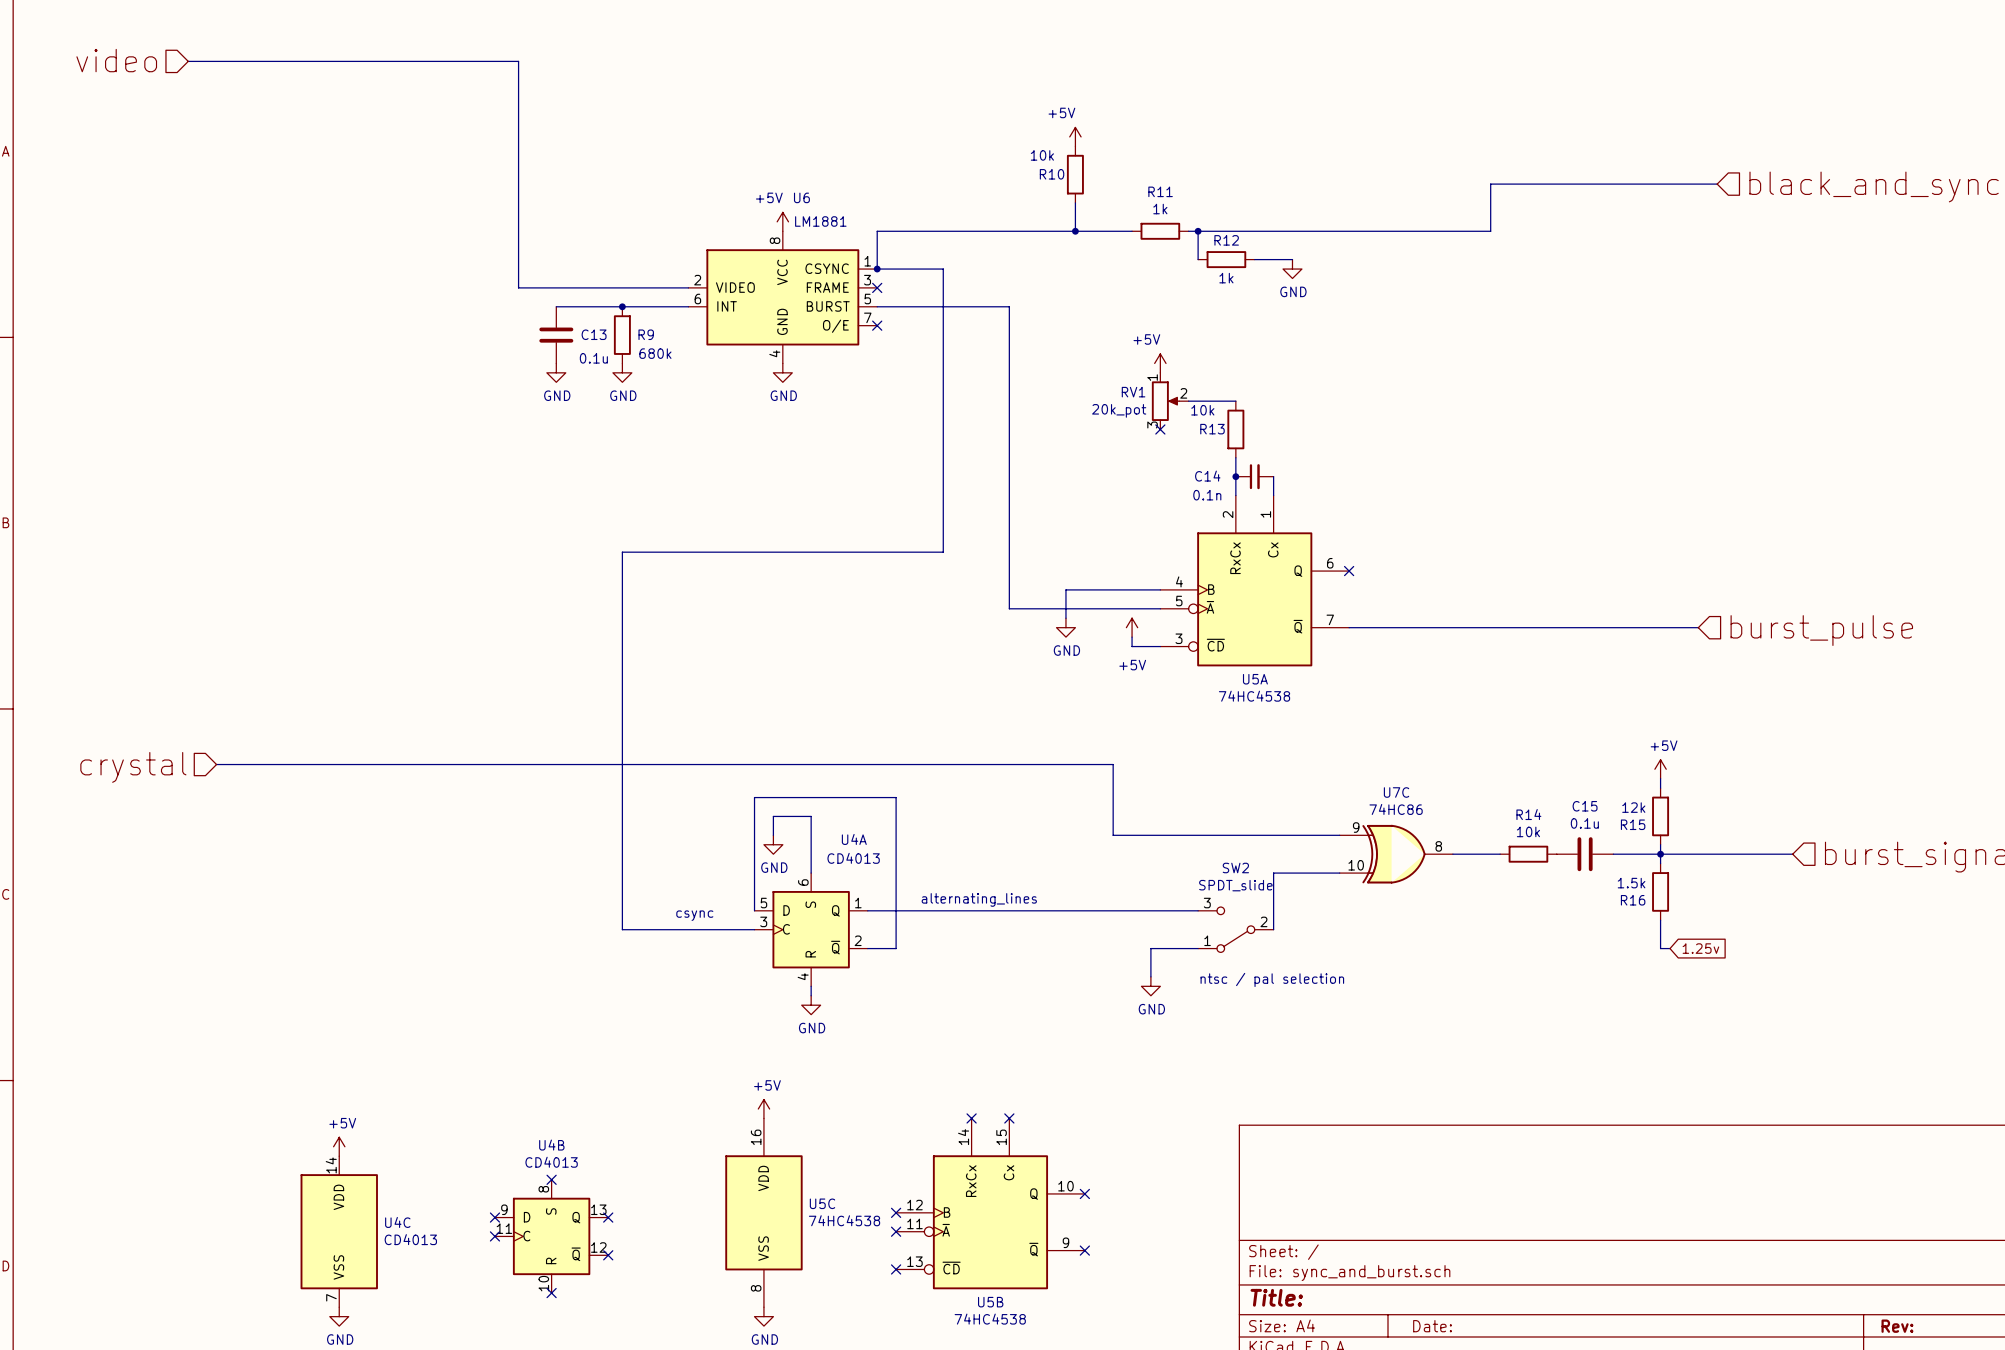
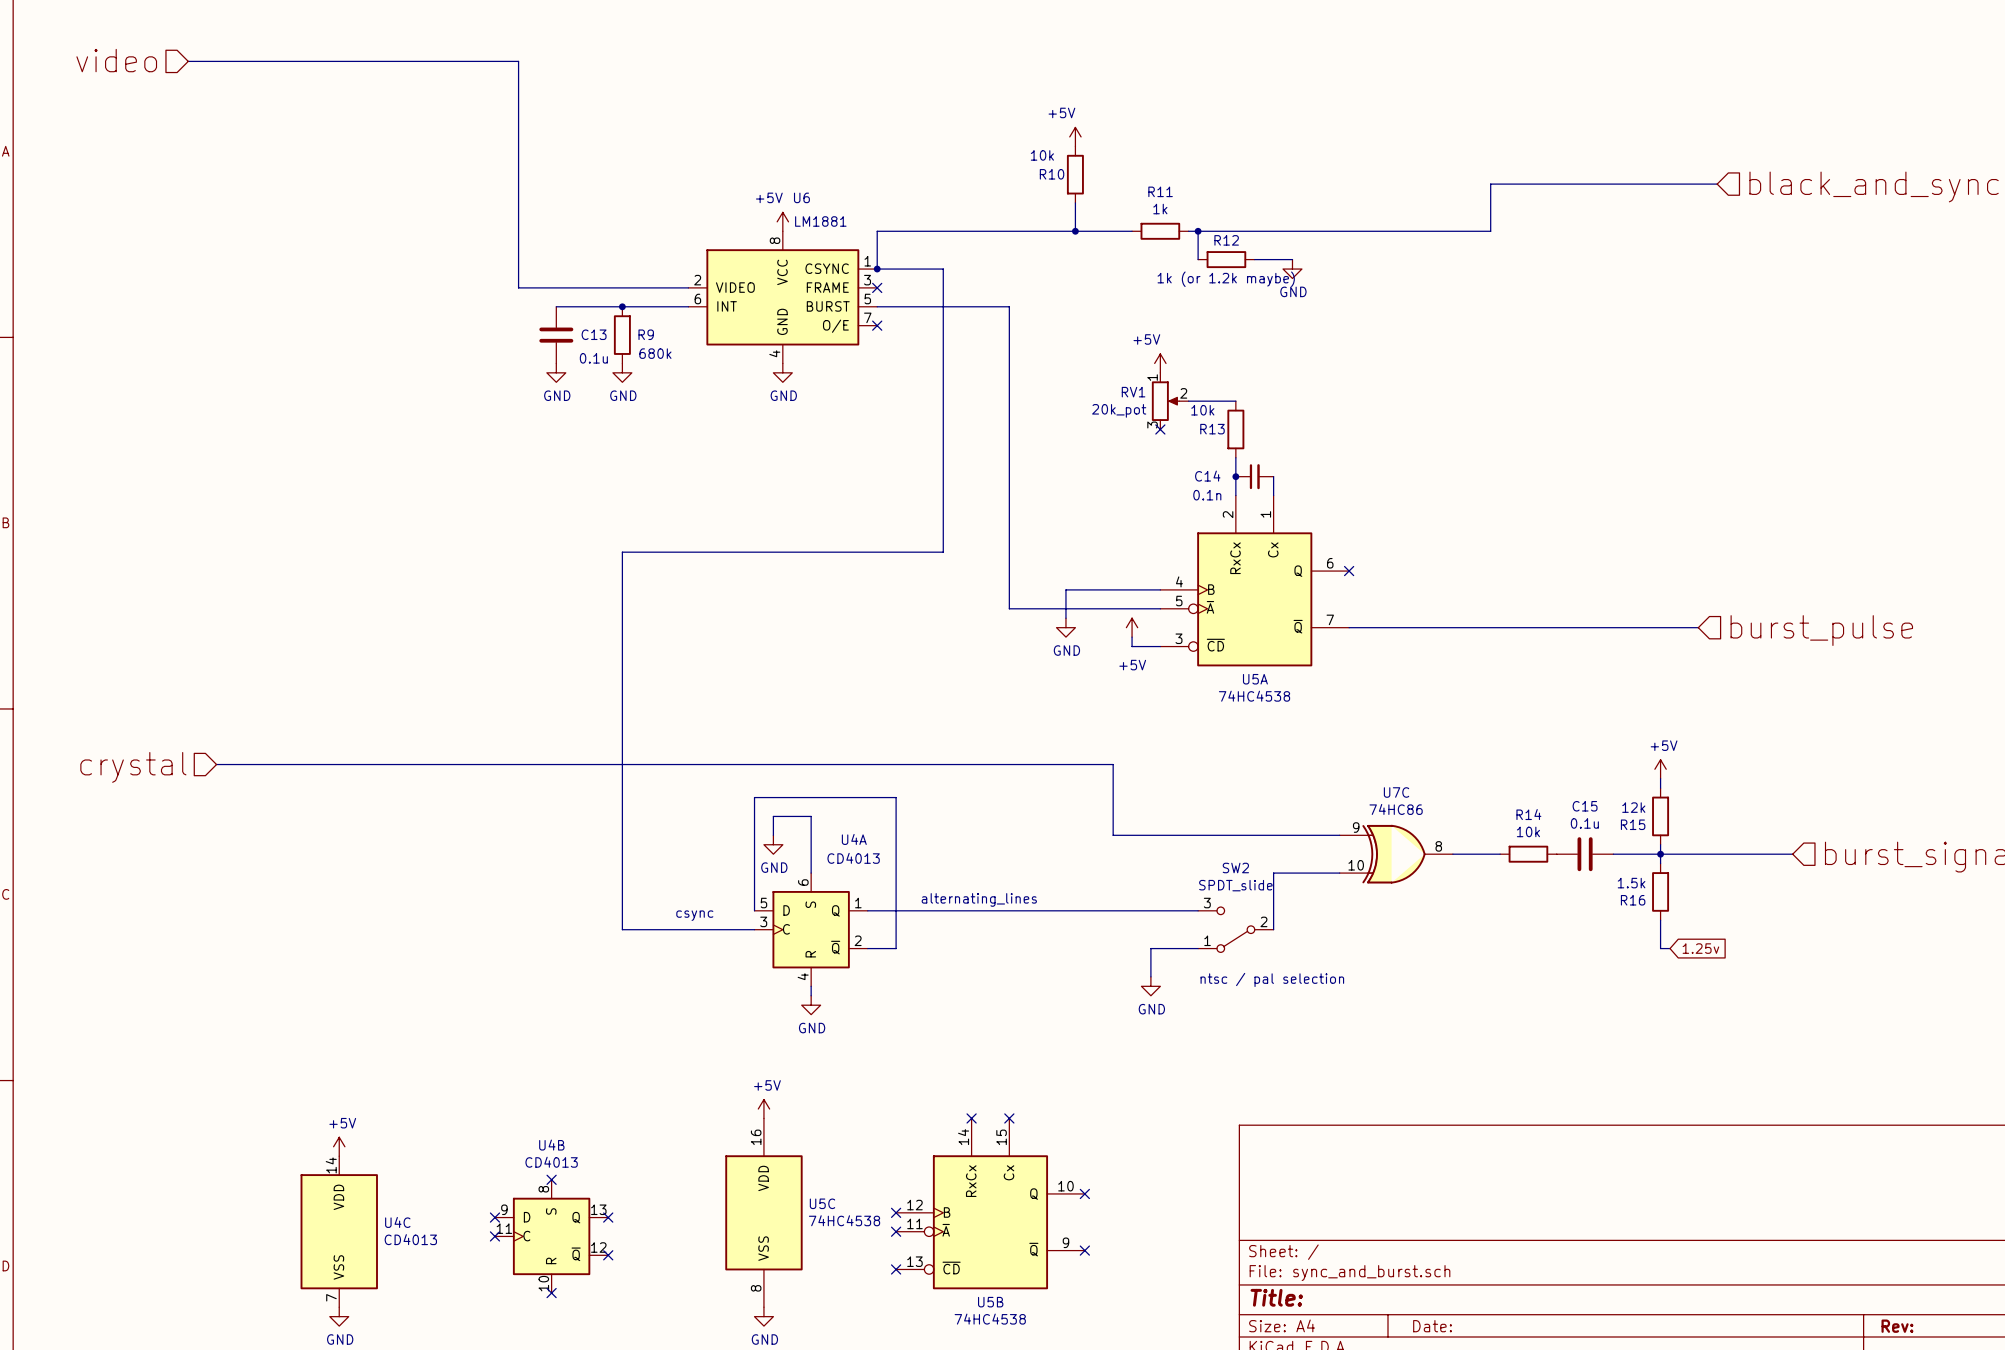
R12 value: 1k (1226, 278) -> 1k (or 1.2k maybe) (1226, 279)

